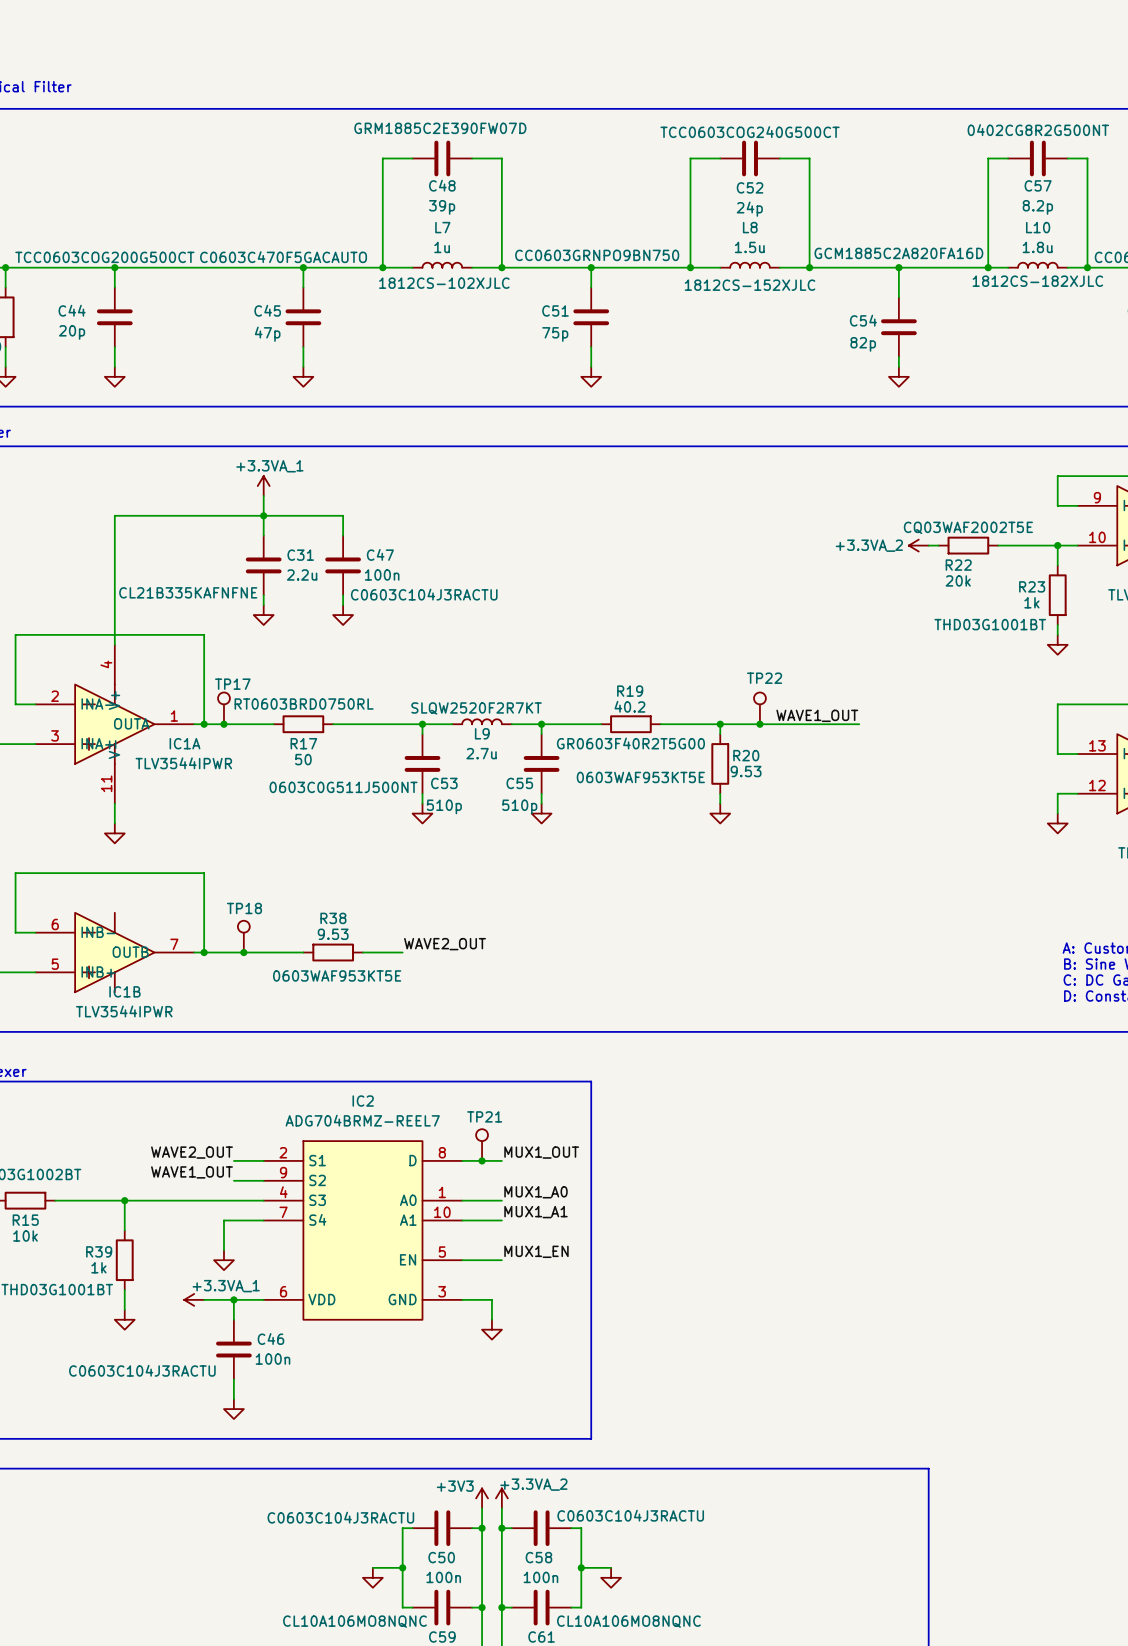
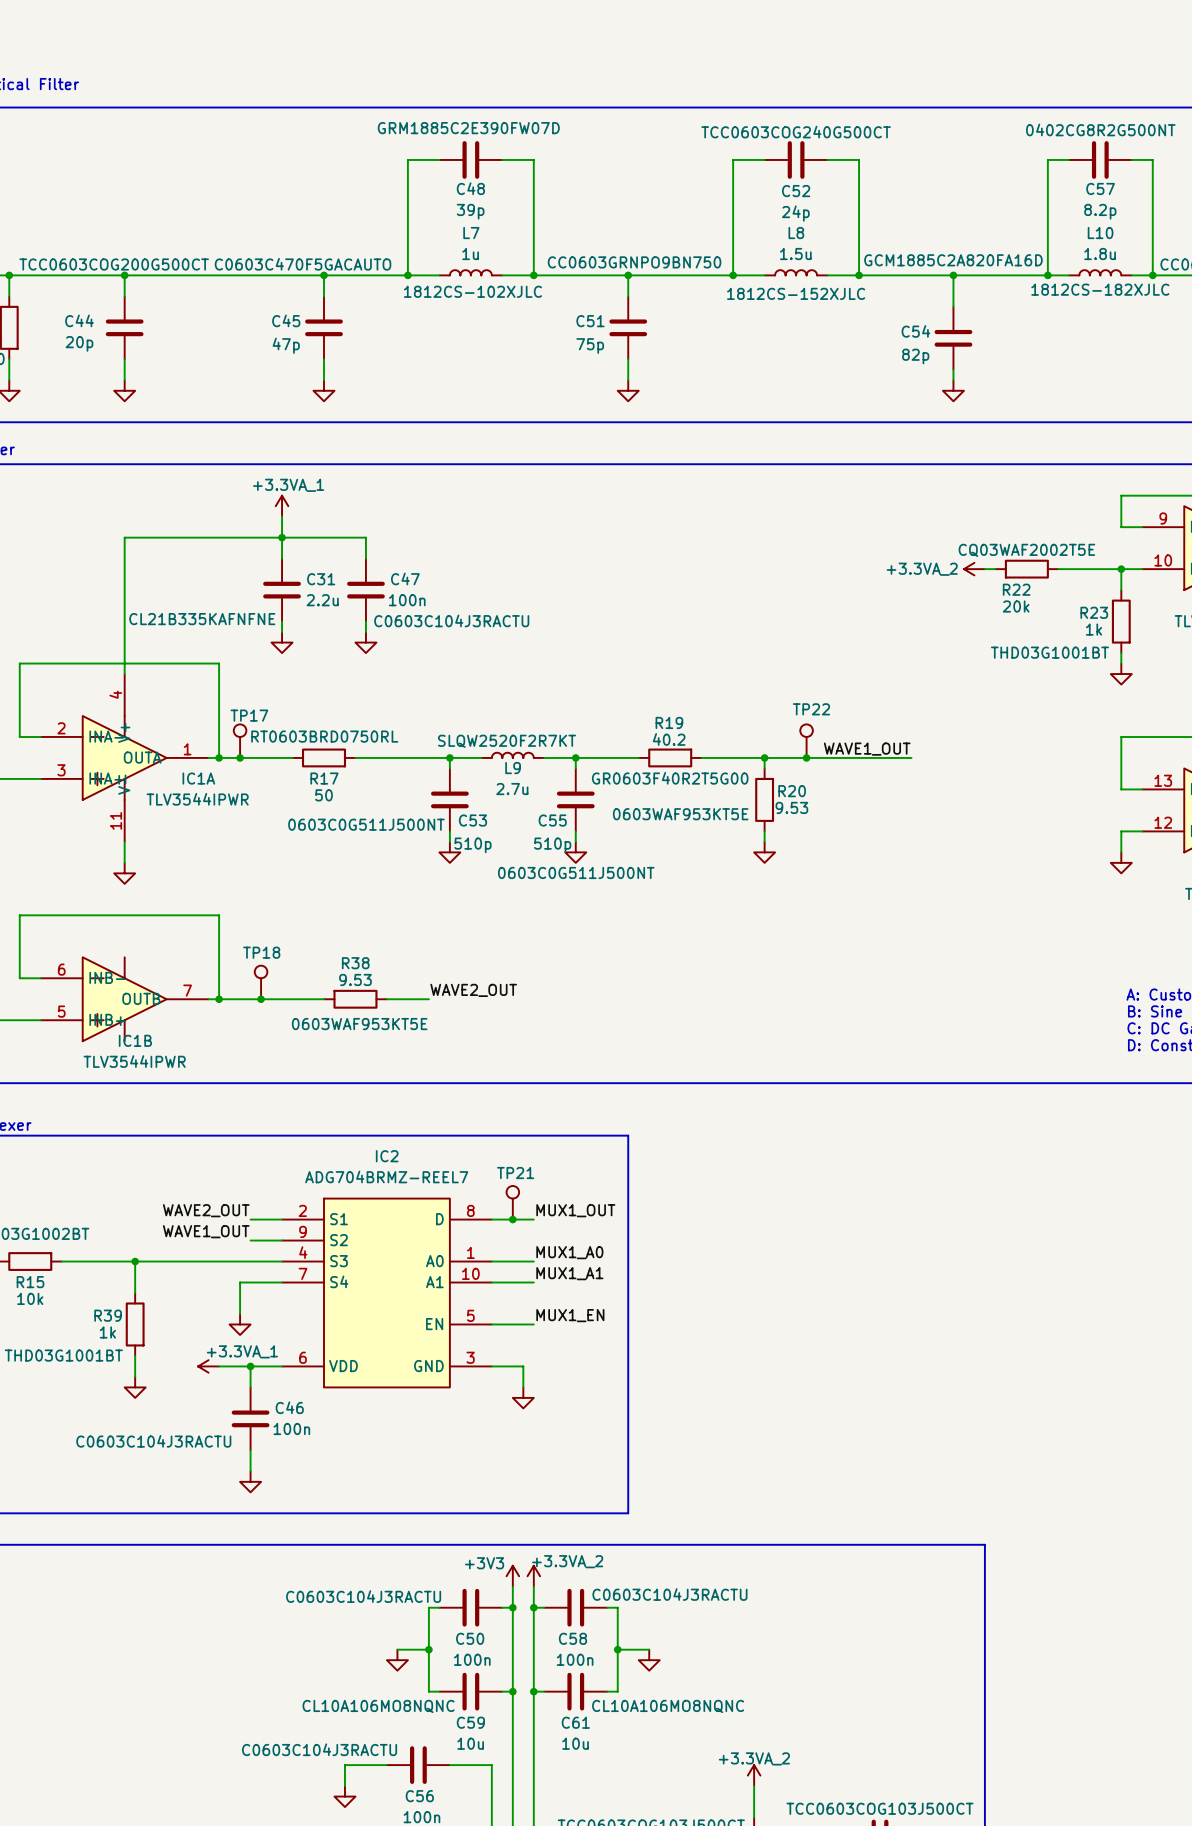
C55 text: none -> 0603C0G511J500NT (576, 872)

